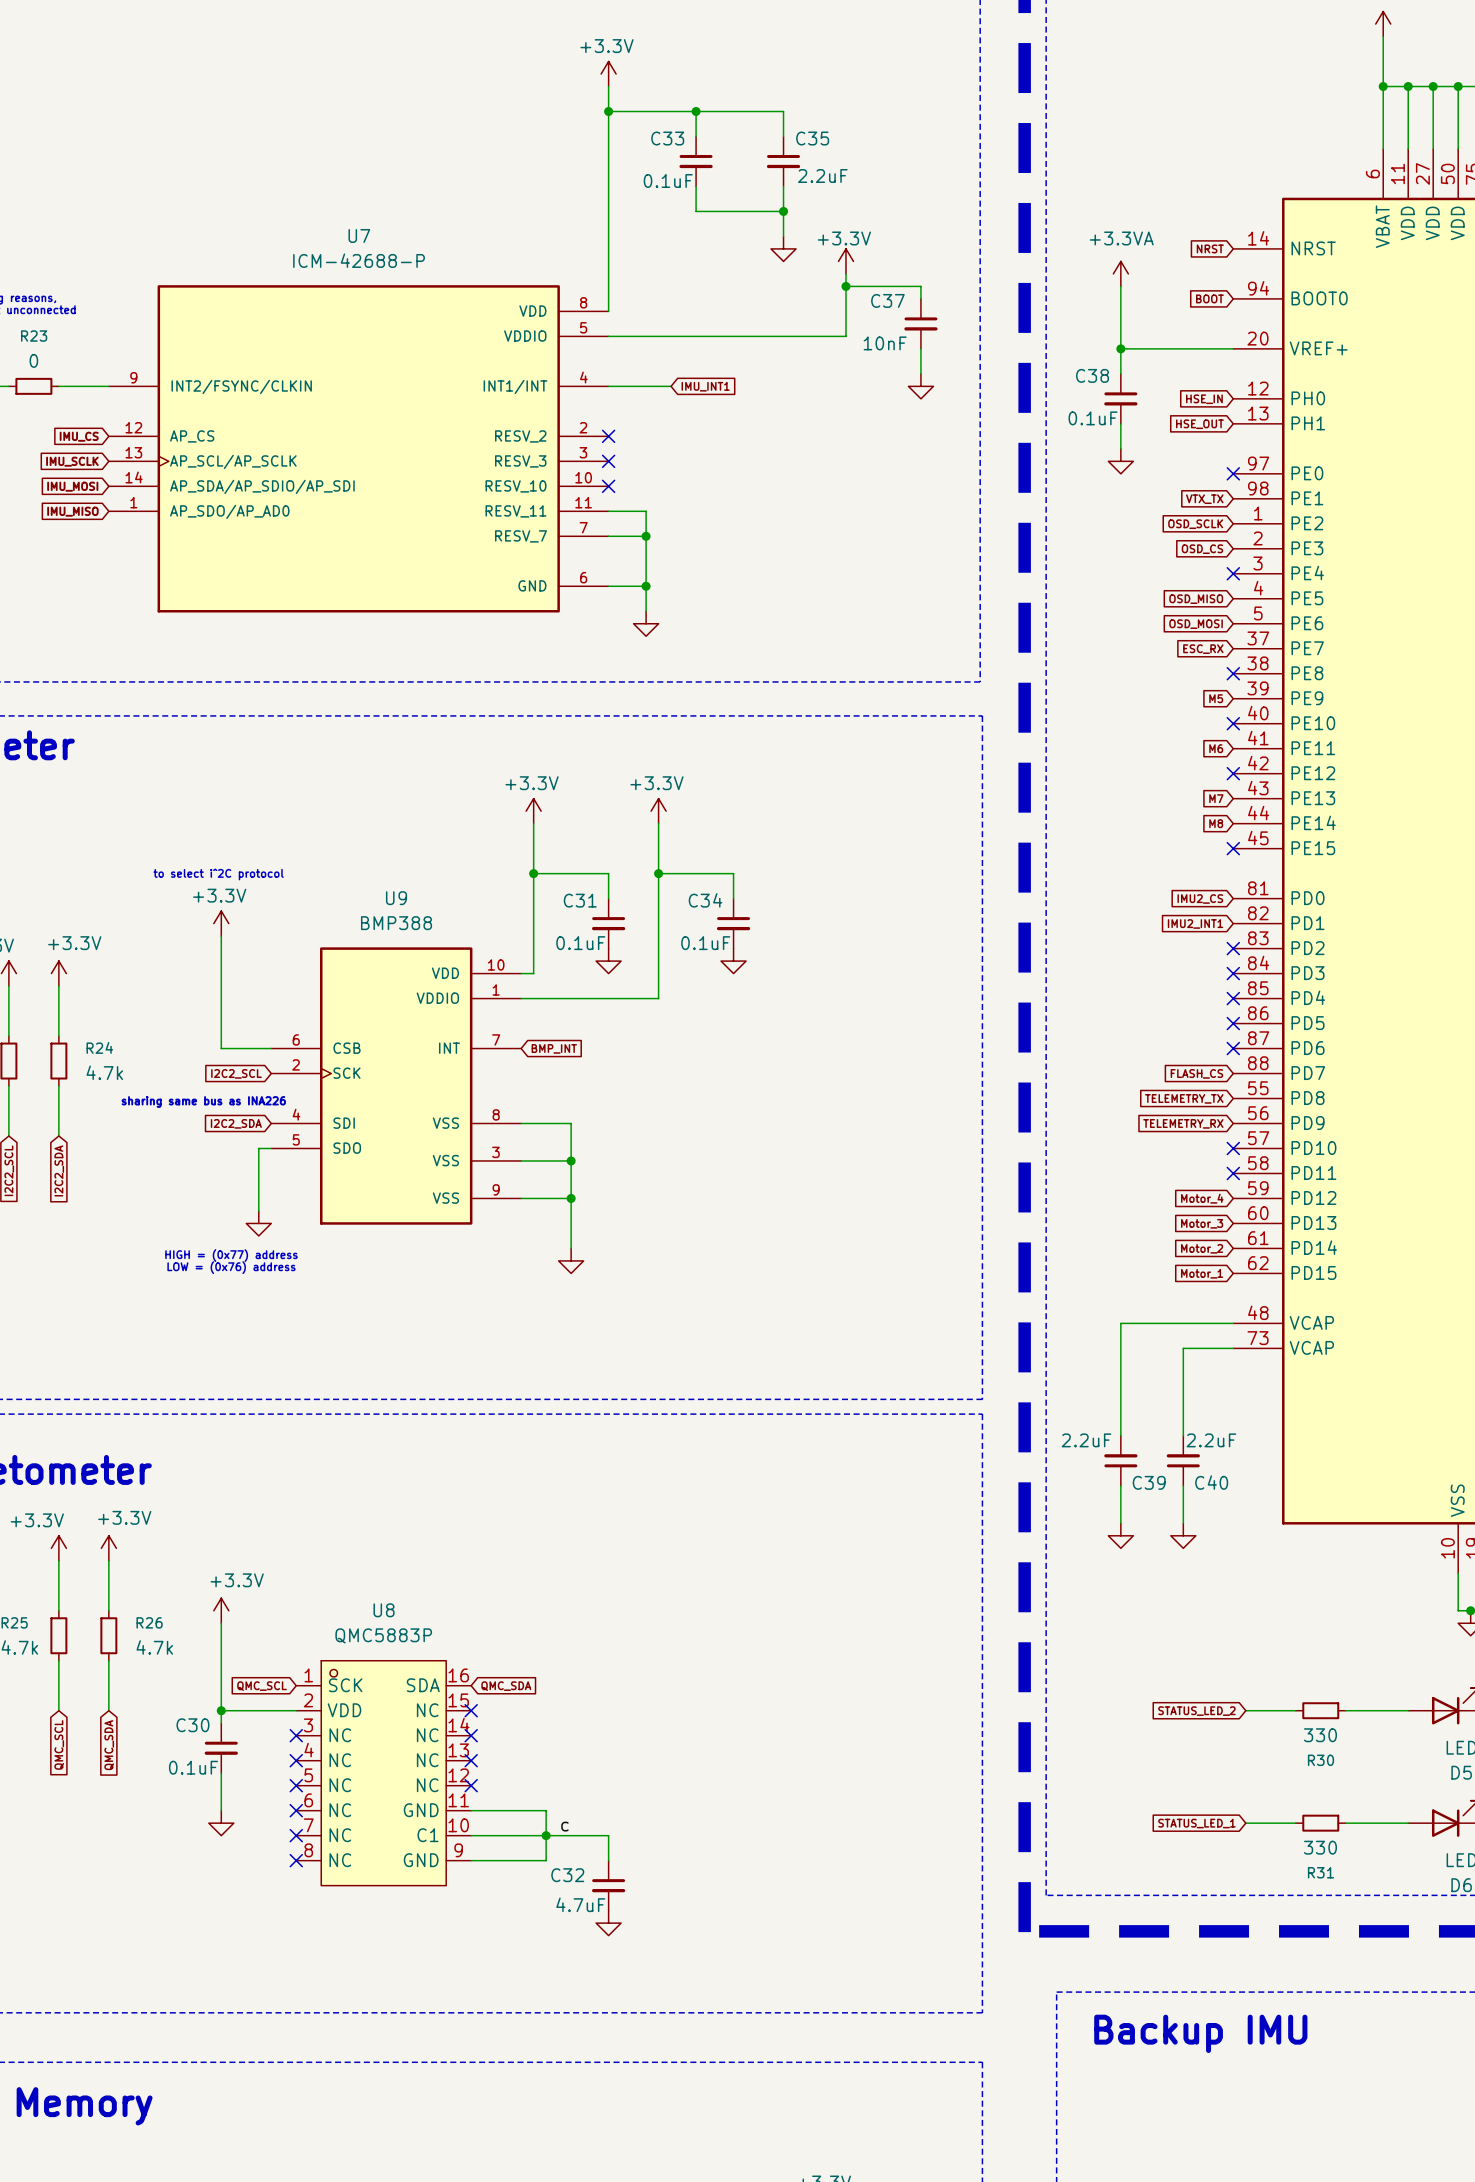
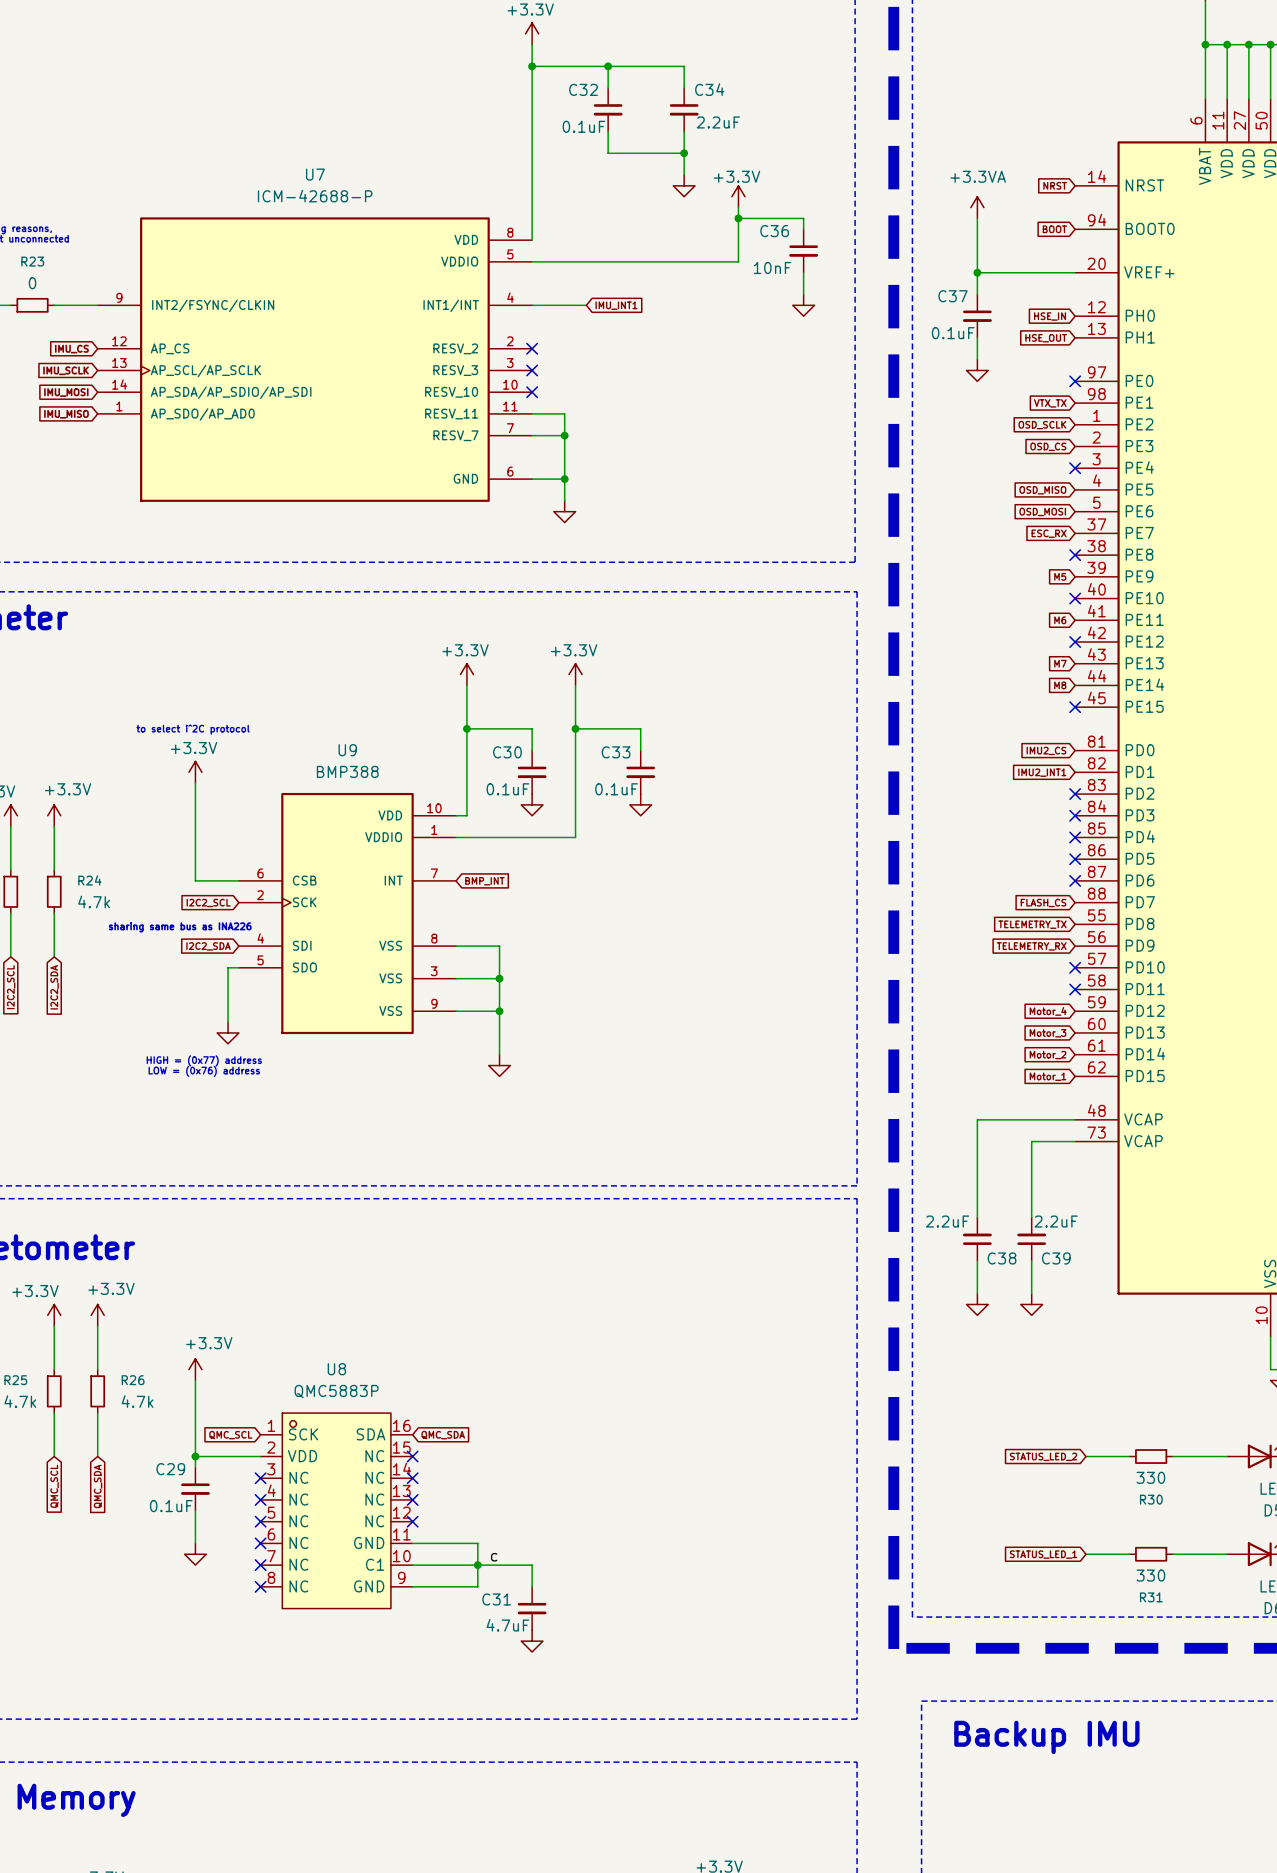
C33 name: C33 (667, 138) -> C32 (583, 89)
C35 name: C35 (812, 138) -> C34 (709, 89)
C37 name: C37 (887, 300) -> C36 (774, 231)
C38 name: C38 (1092, 375) -> C37 (953, 296)
C31 name: C31 (580, 900) -> C30 (507, 752)
C34 name: C34 (705, 900) -> C33 (616, 752)
C39 name: C39 (1149, 1482) -> C38 (1002, 1258)
C40 name: C40 (1211, 1482) -> C39 (1056, 1258)
C30 name: C30 (192, 1725) -> C29 (170, 1469)
C32 name: C32 (567, 1875) -> C31 (496, 1599)

